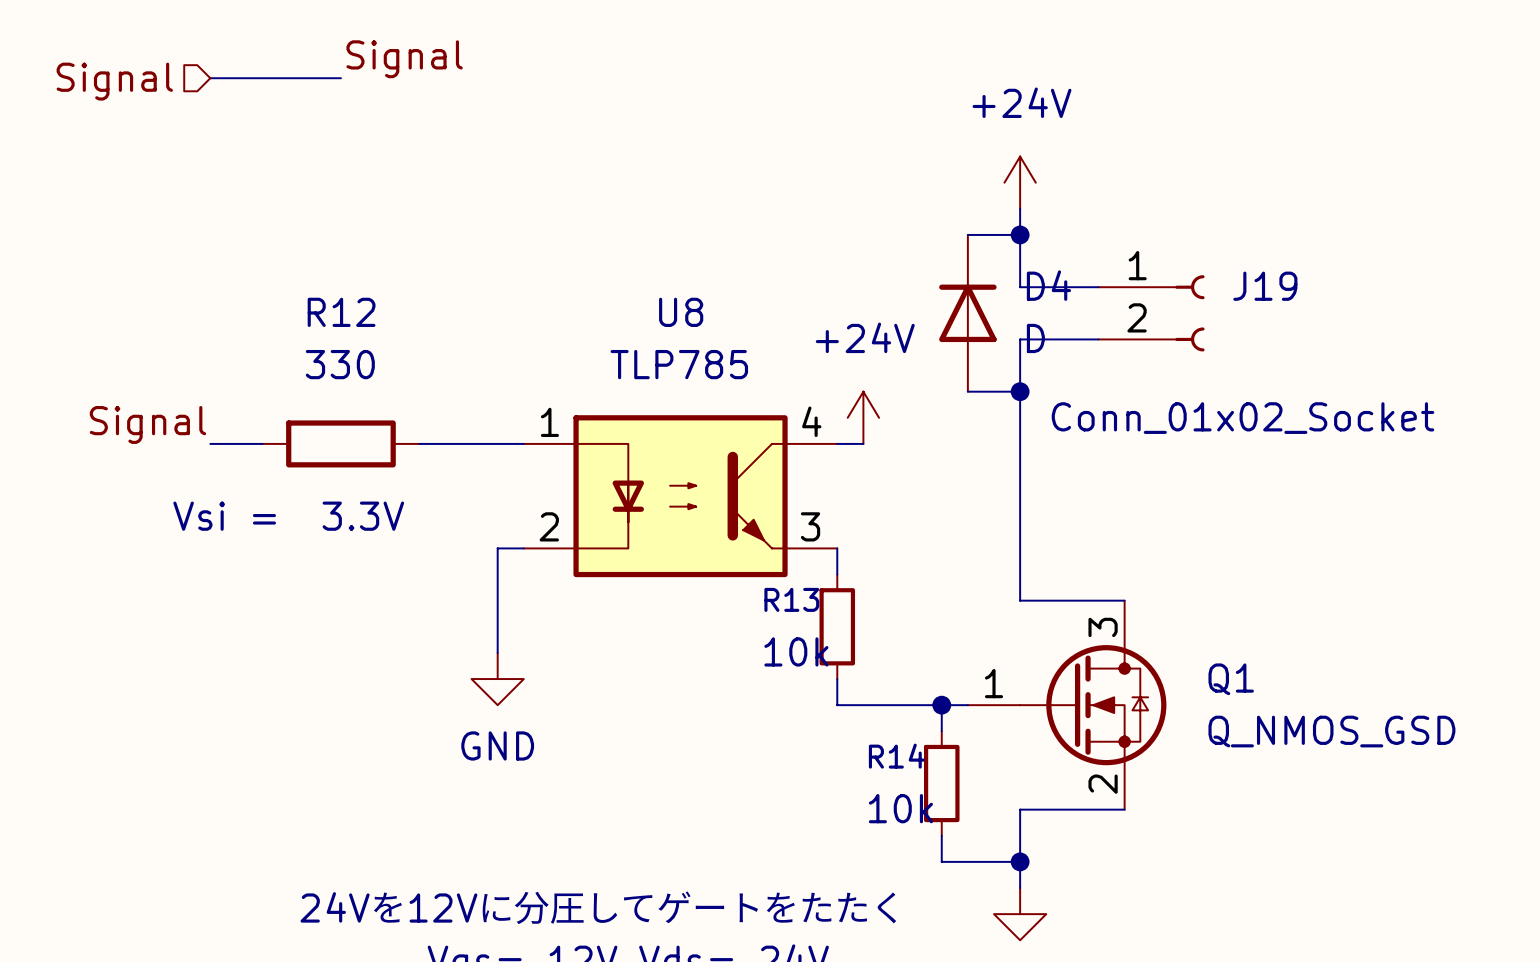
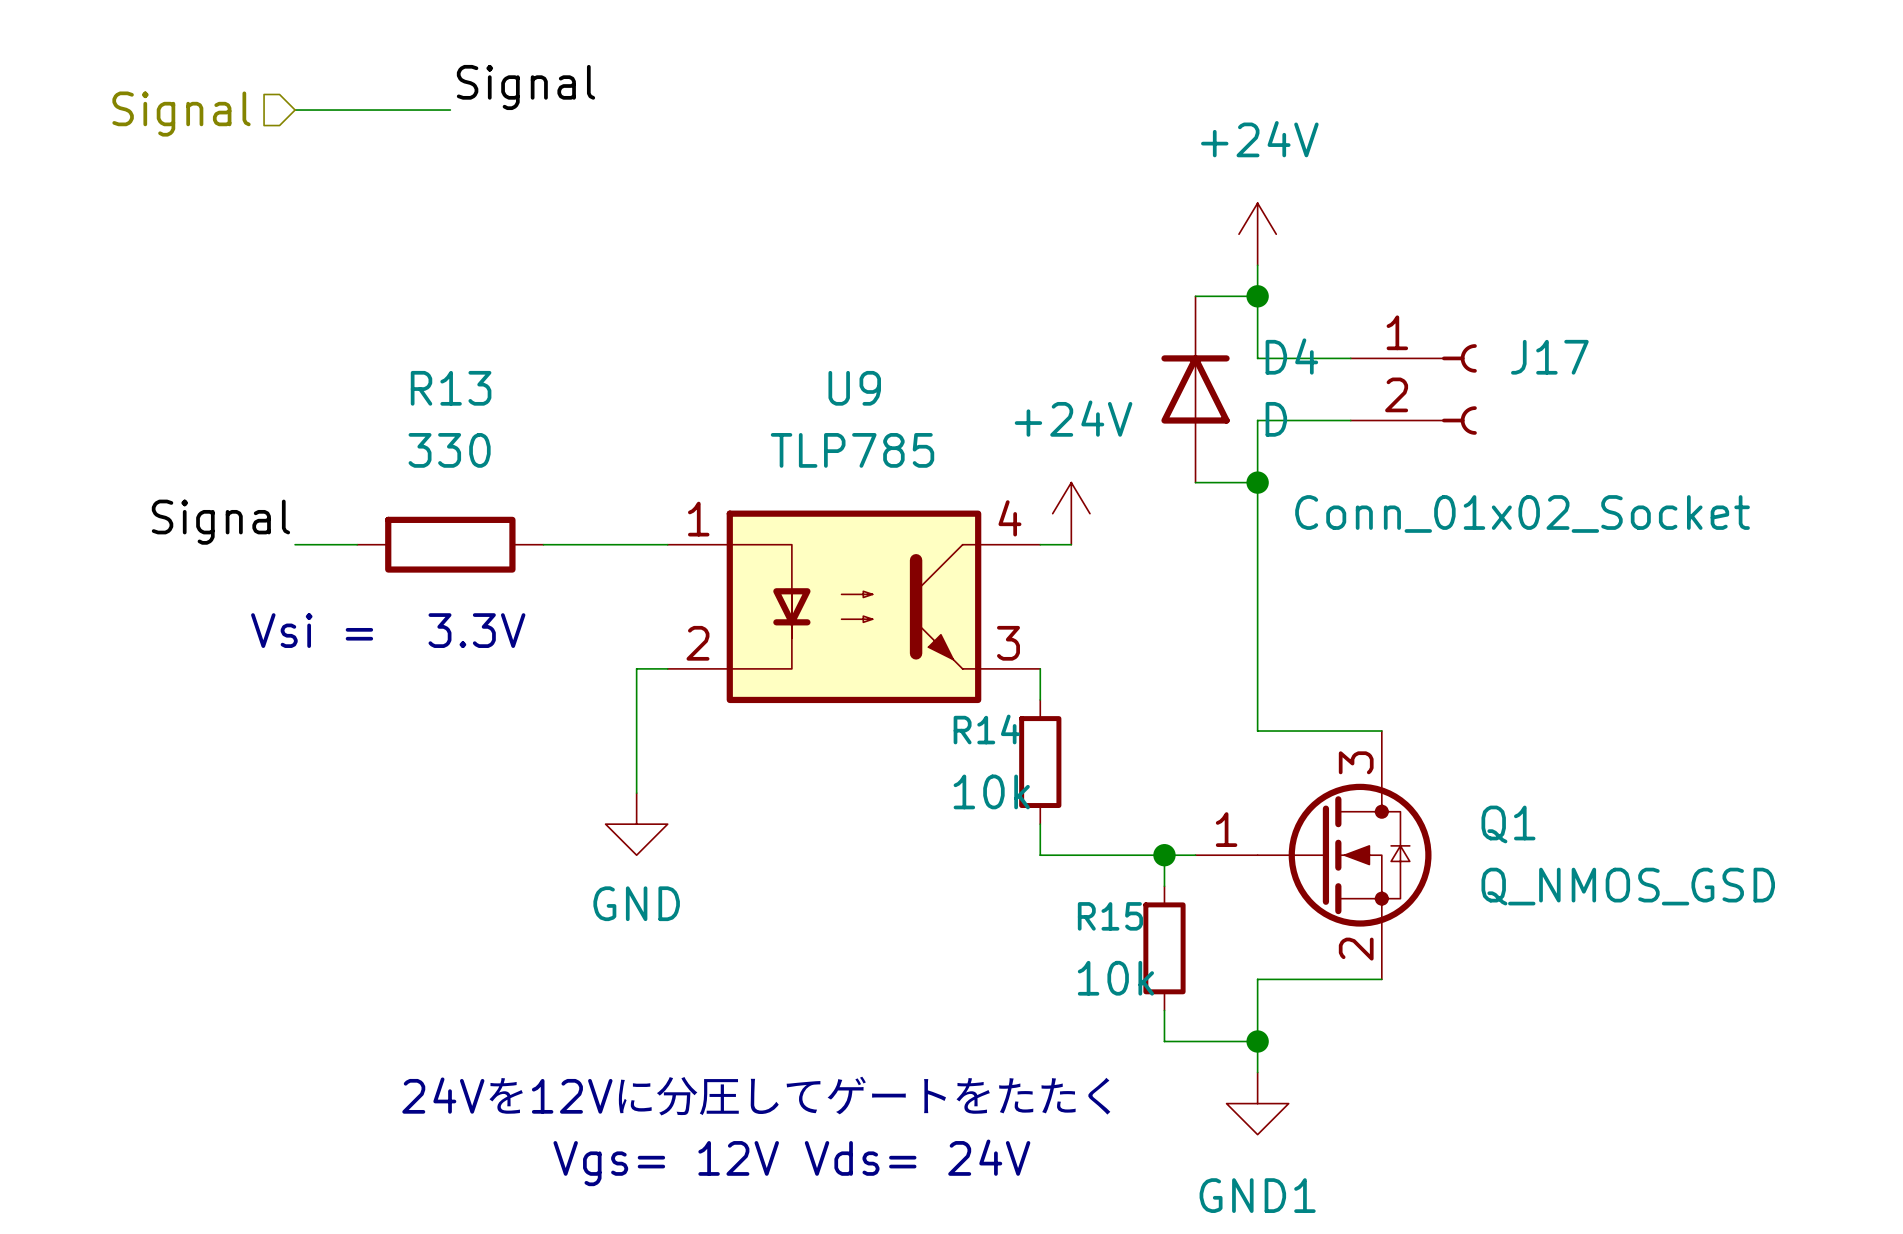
J19 name: J19 (1265, 286) -> J17 (1549, 357)
R12 name: R12 (341, 312) -> R13 (451, 388)
U8 name: U8 (681, 312) -> U9 (854, 388)
R13 name: R13 (791, 599) -> R14 (986, 729)
R14 name: R14 (896, 756) -> R15 (1110, 916)

